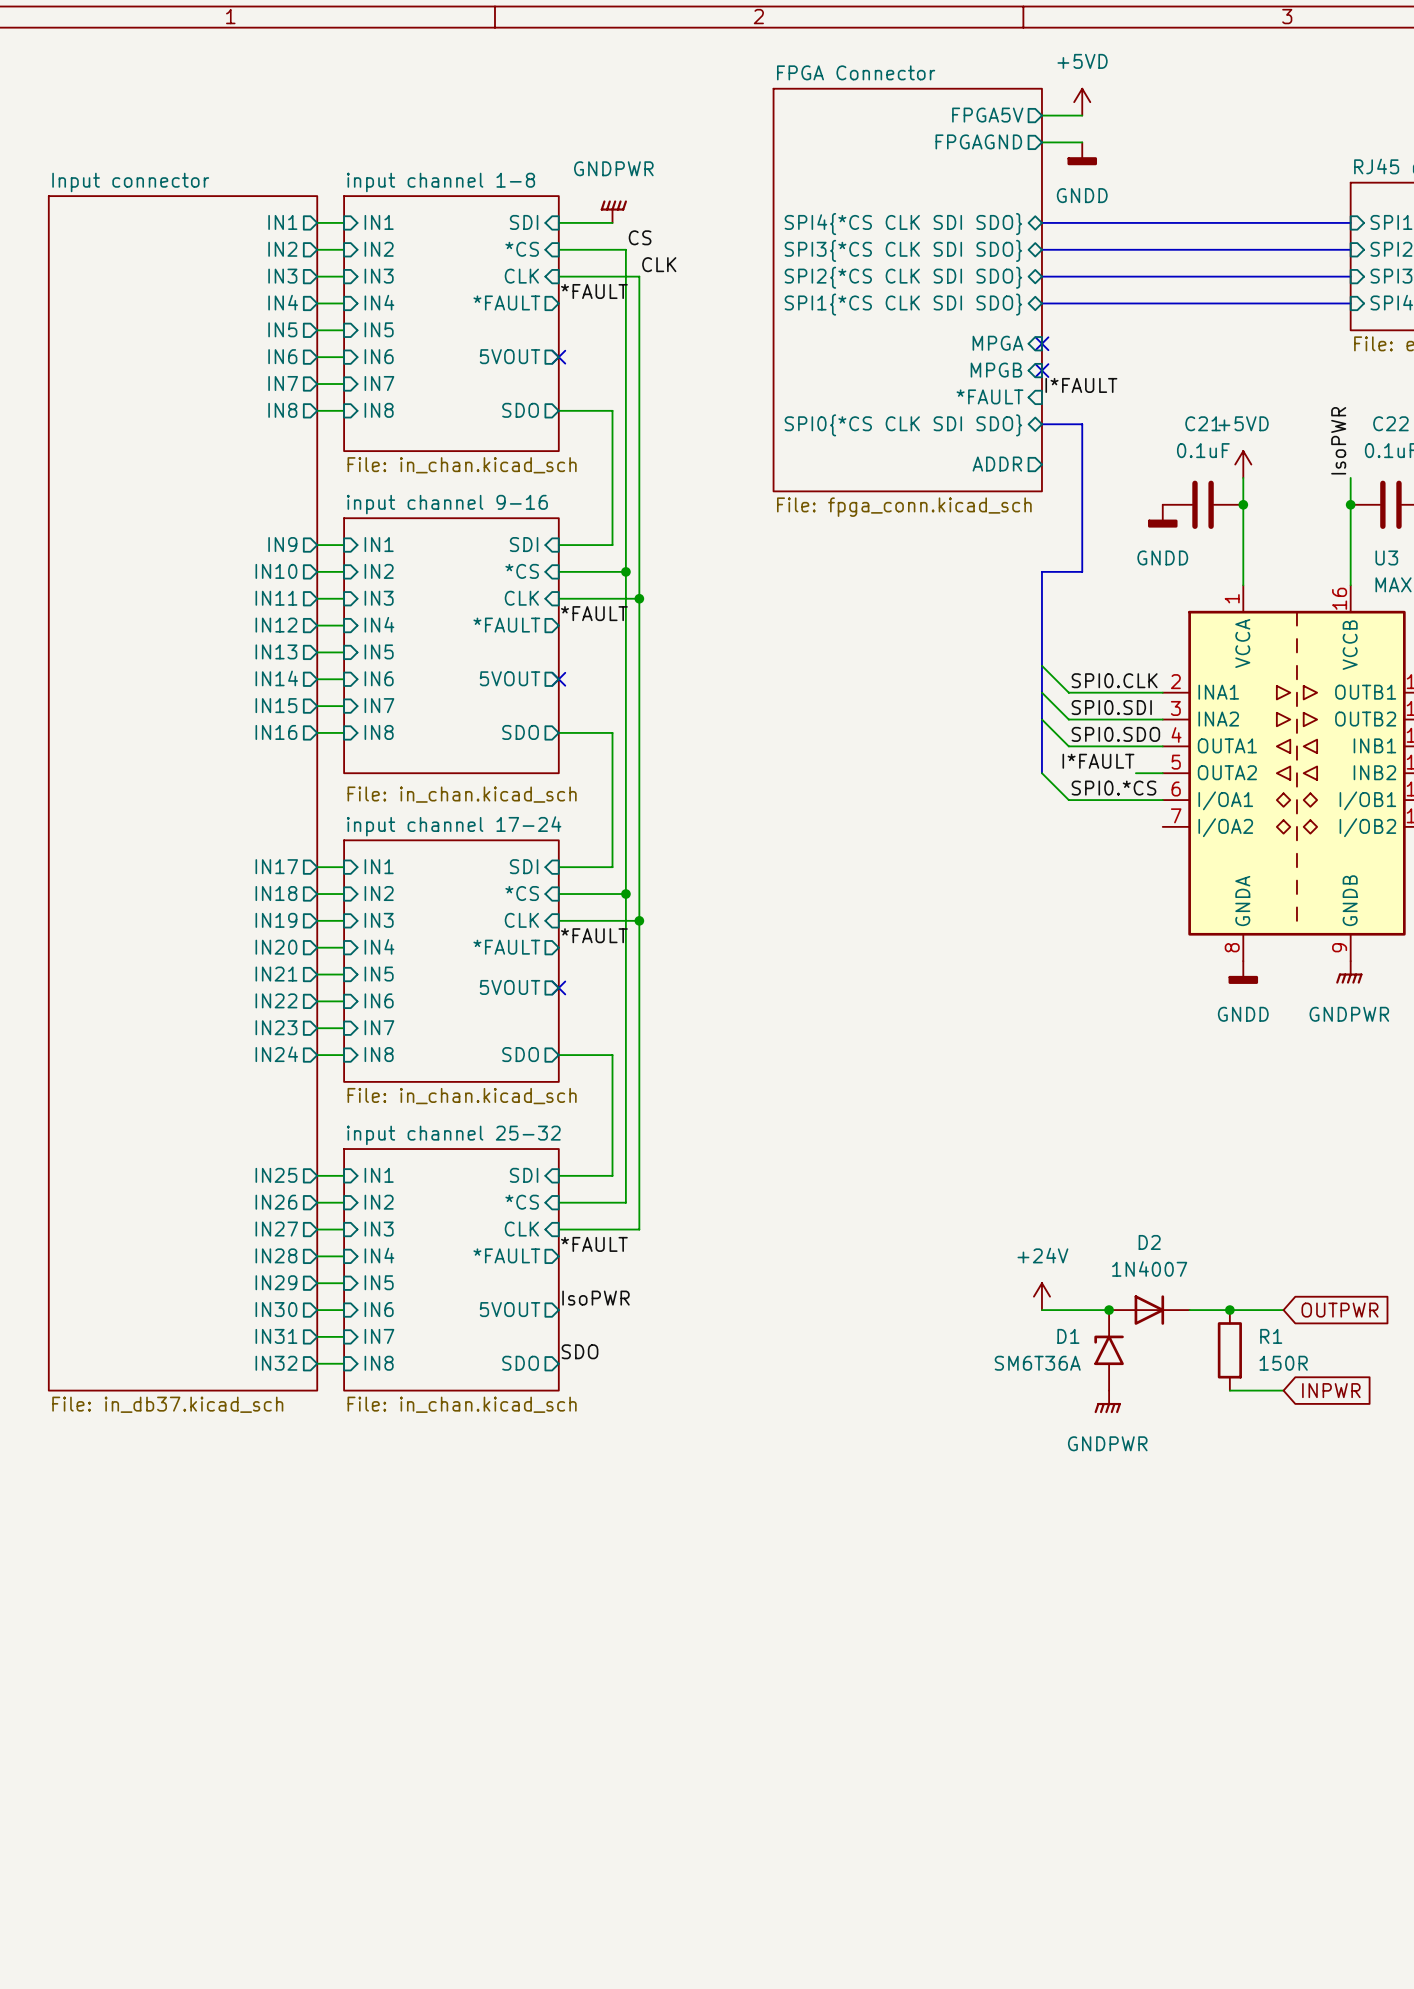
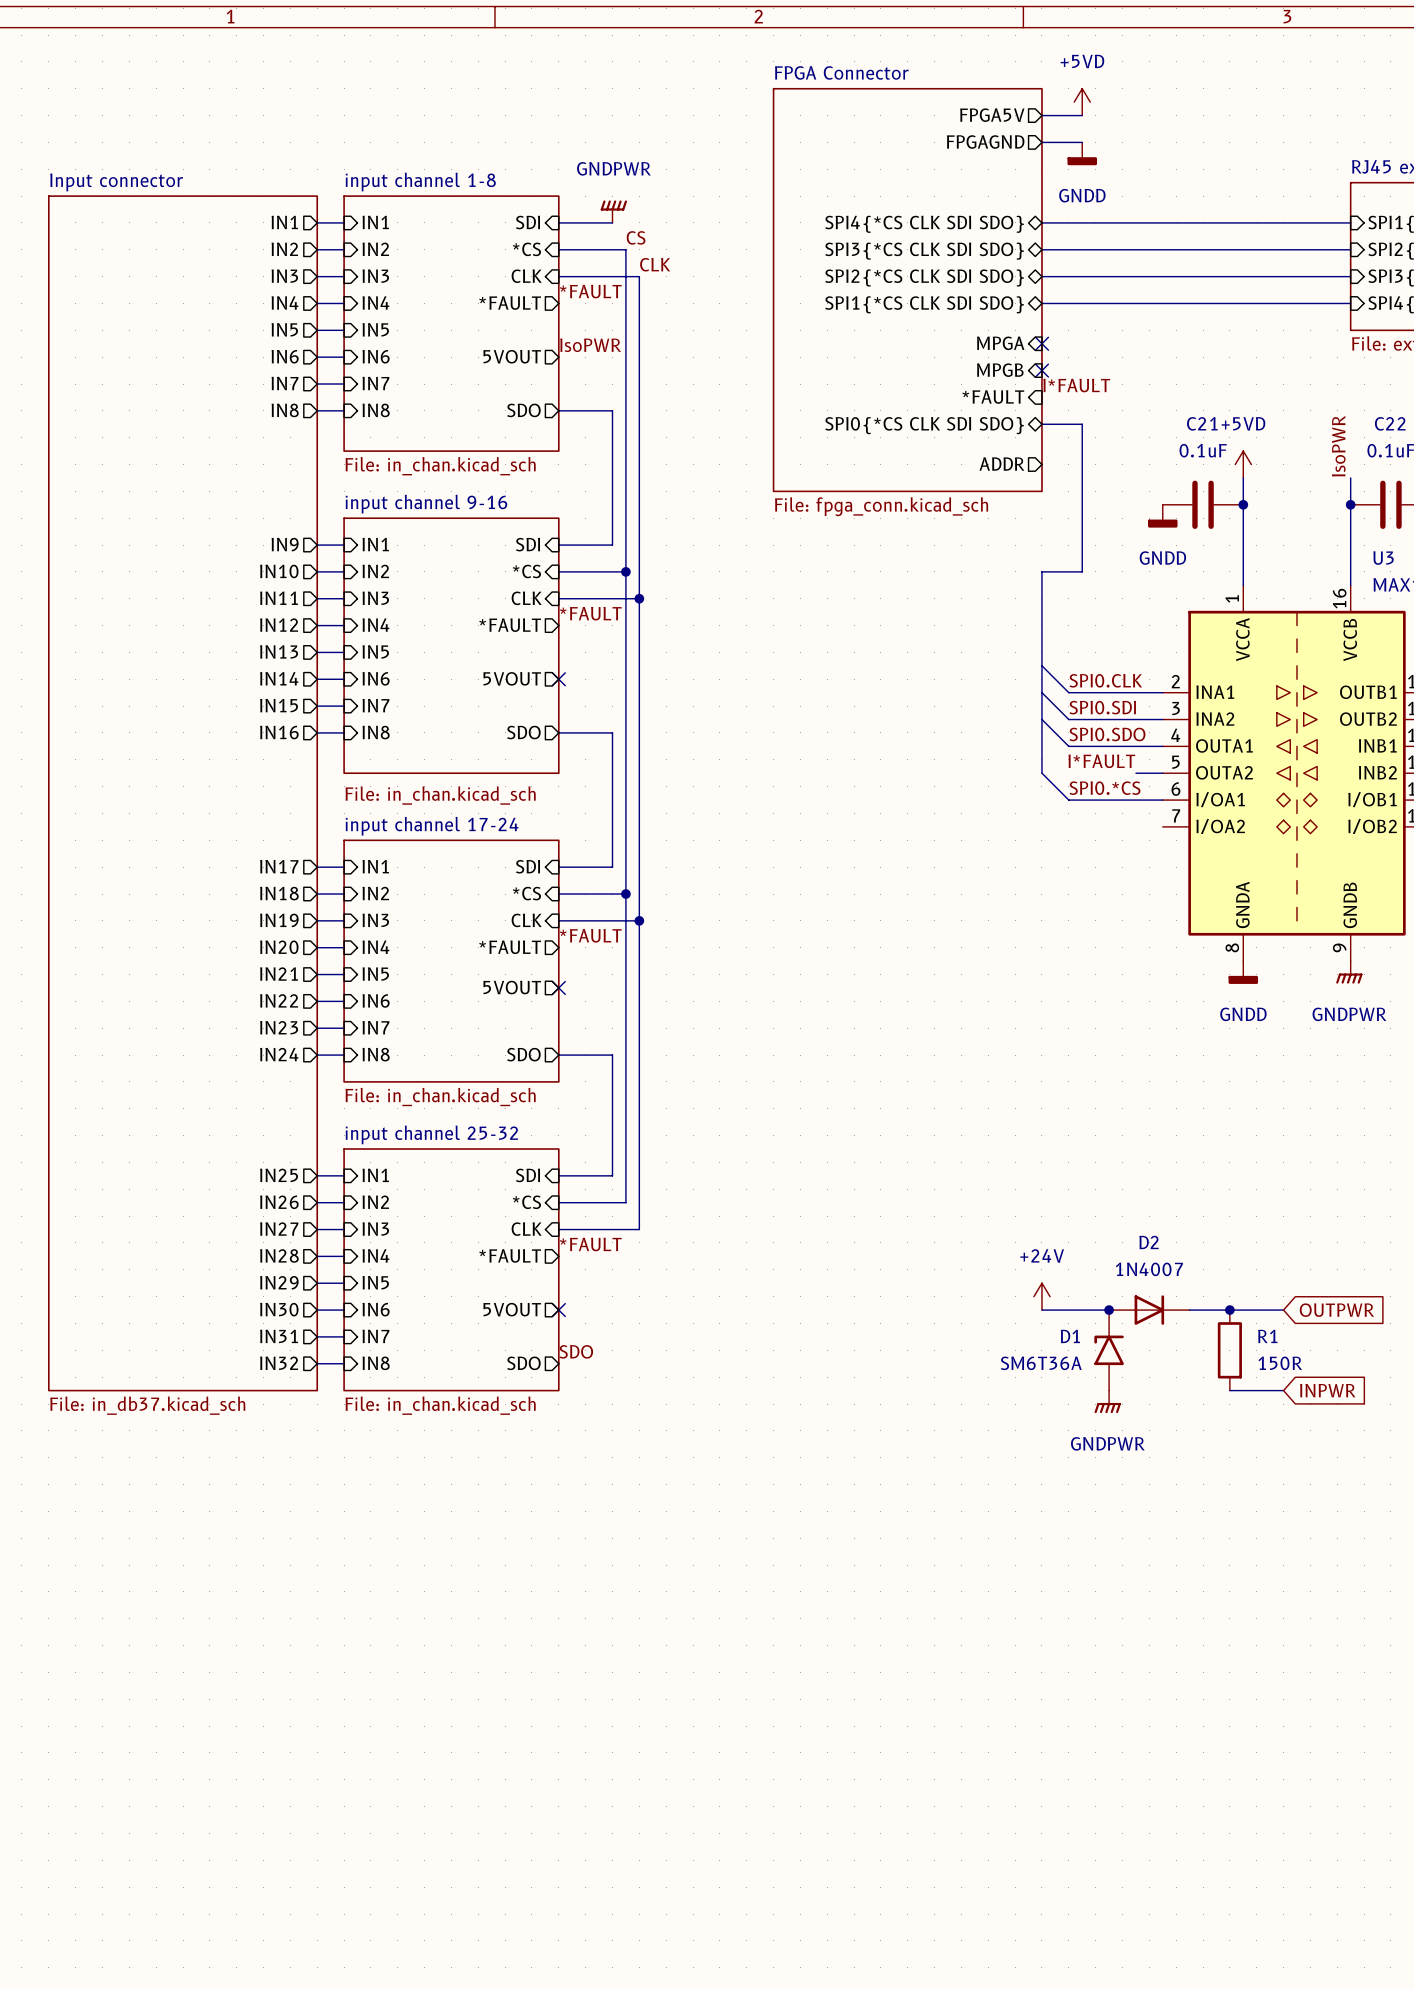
label: none -> IsoPWR (590, 345)
no-connect mark: (558, 357) -> none
label: IsoPWR (595, 1298) -> none
no-connect mark: none -> (558, 1310)

